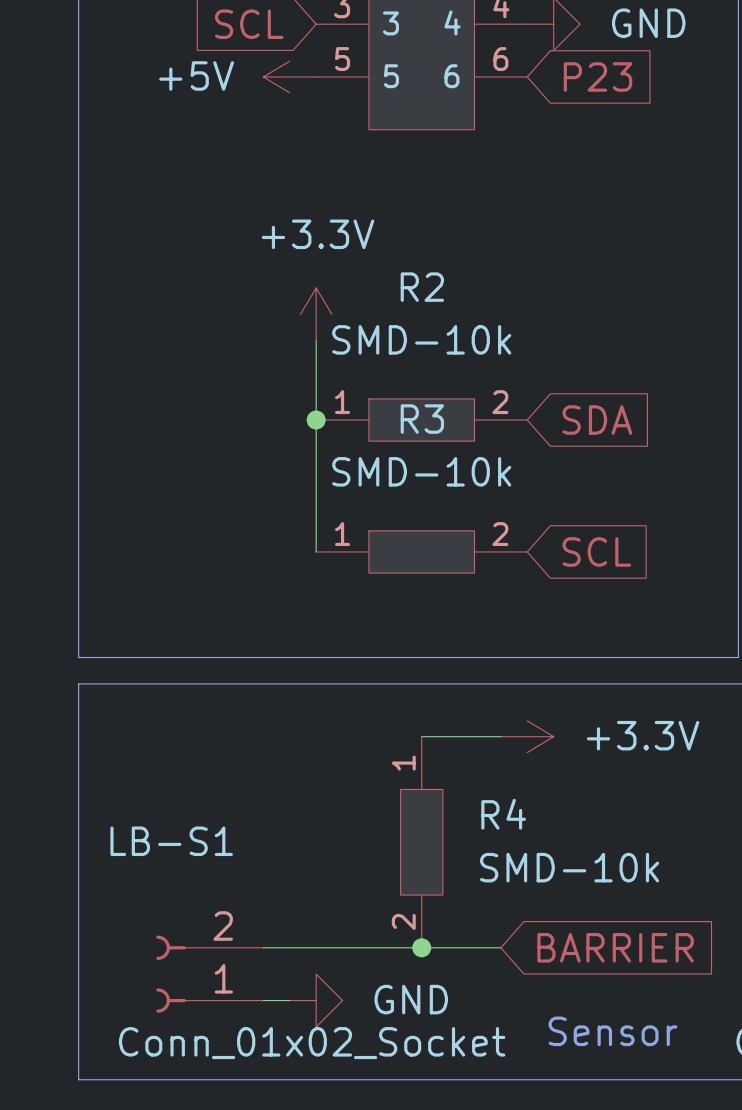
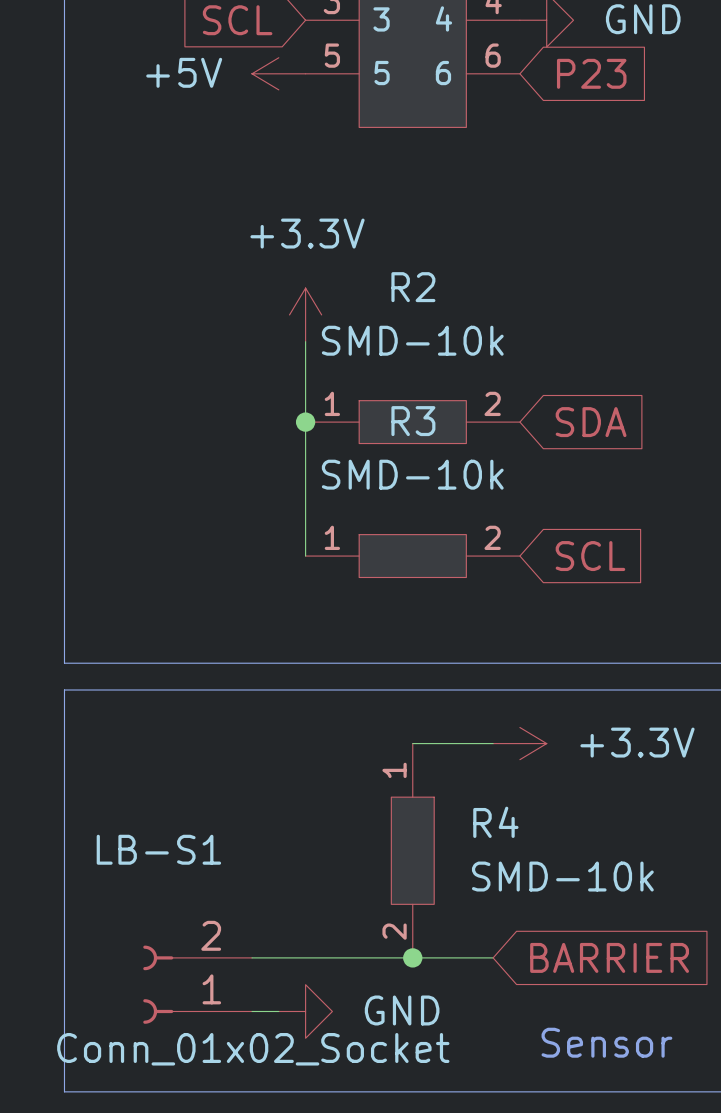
LB-S1 value position: Conn_01x02_Socket (312, 1043) -> Conn_01x02_Socket (253, 1049)

